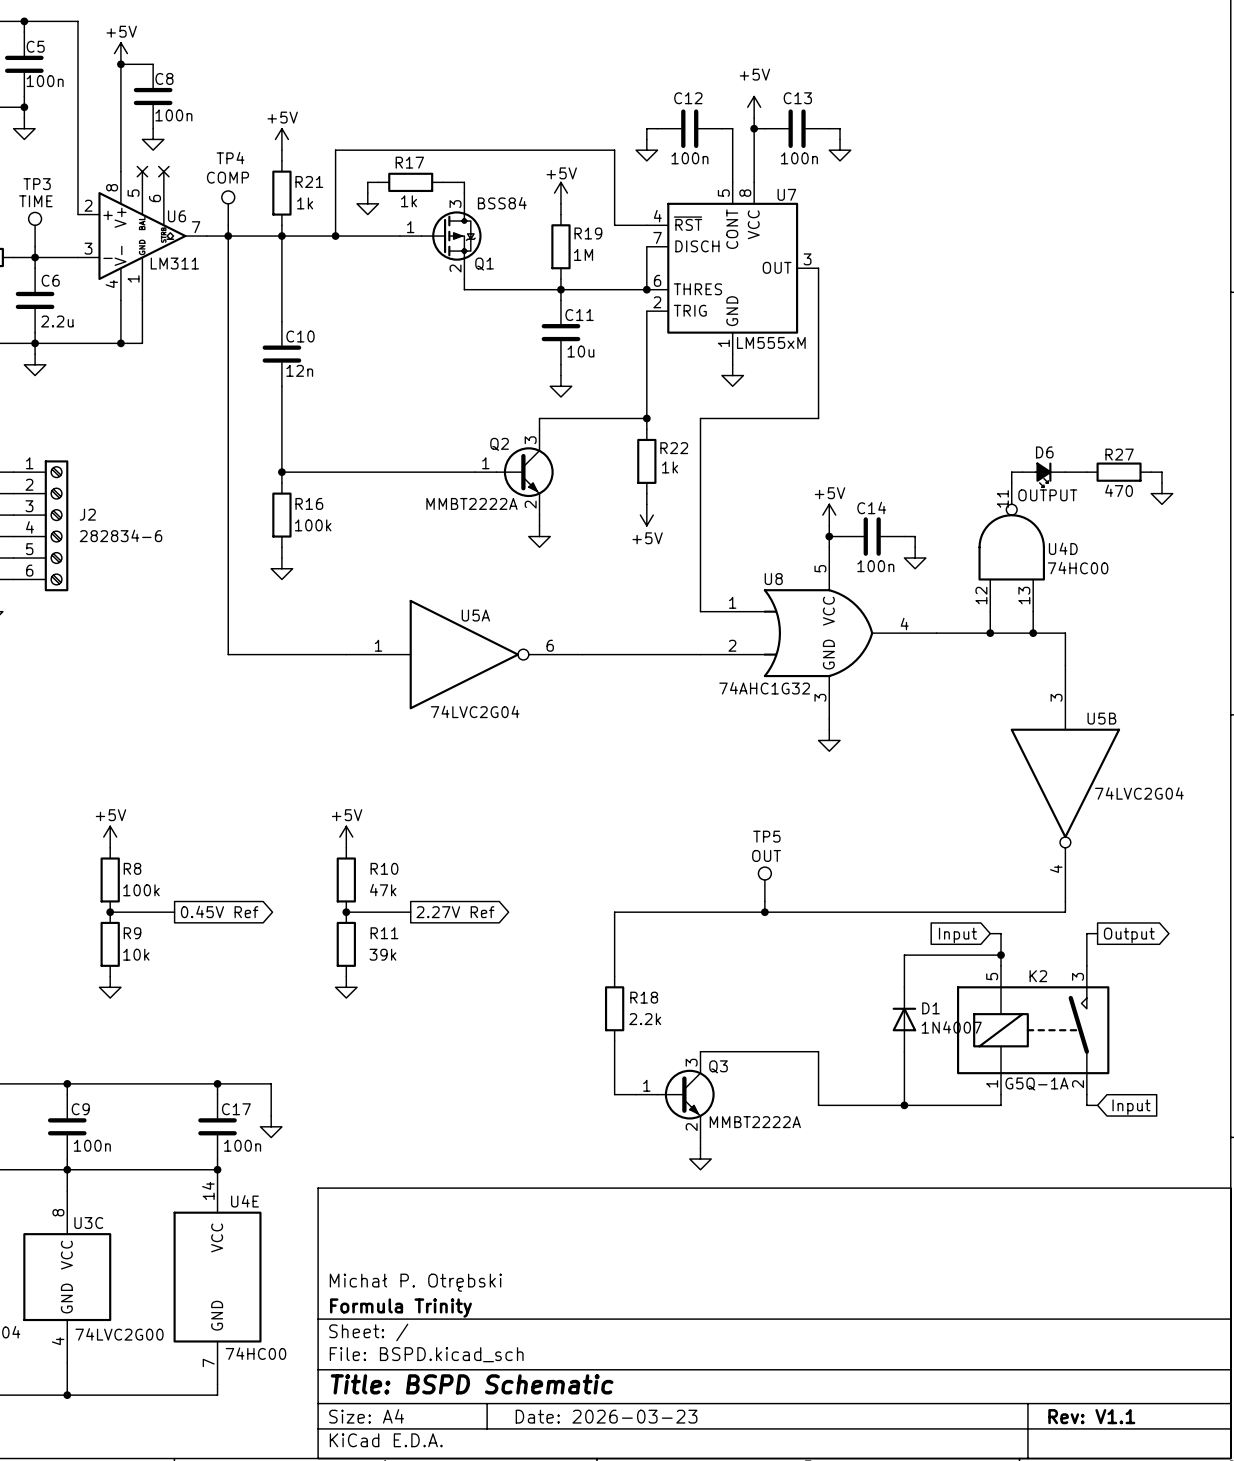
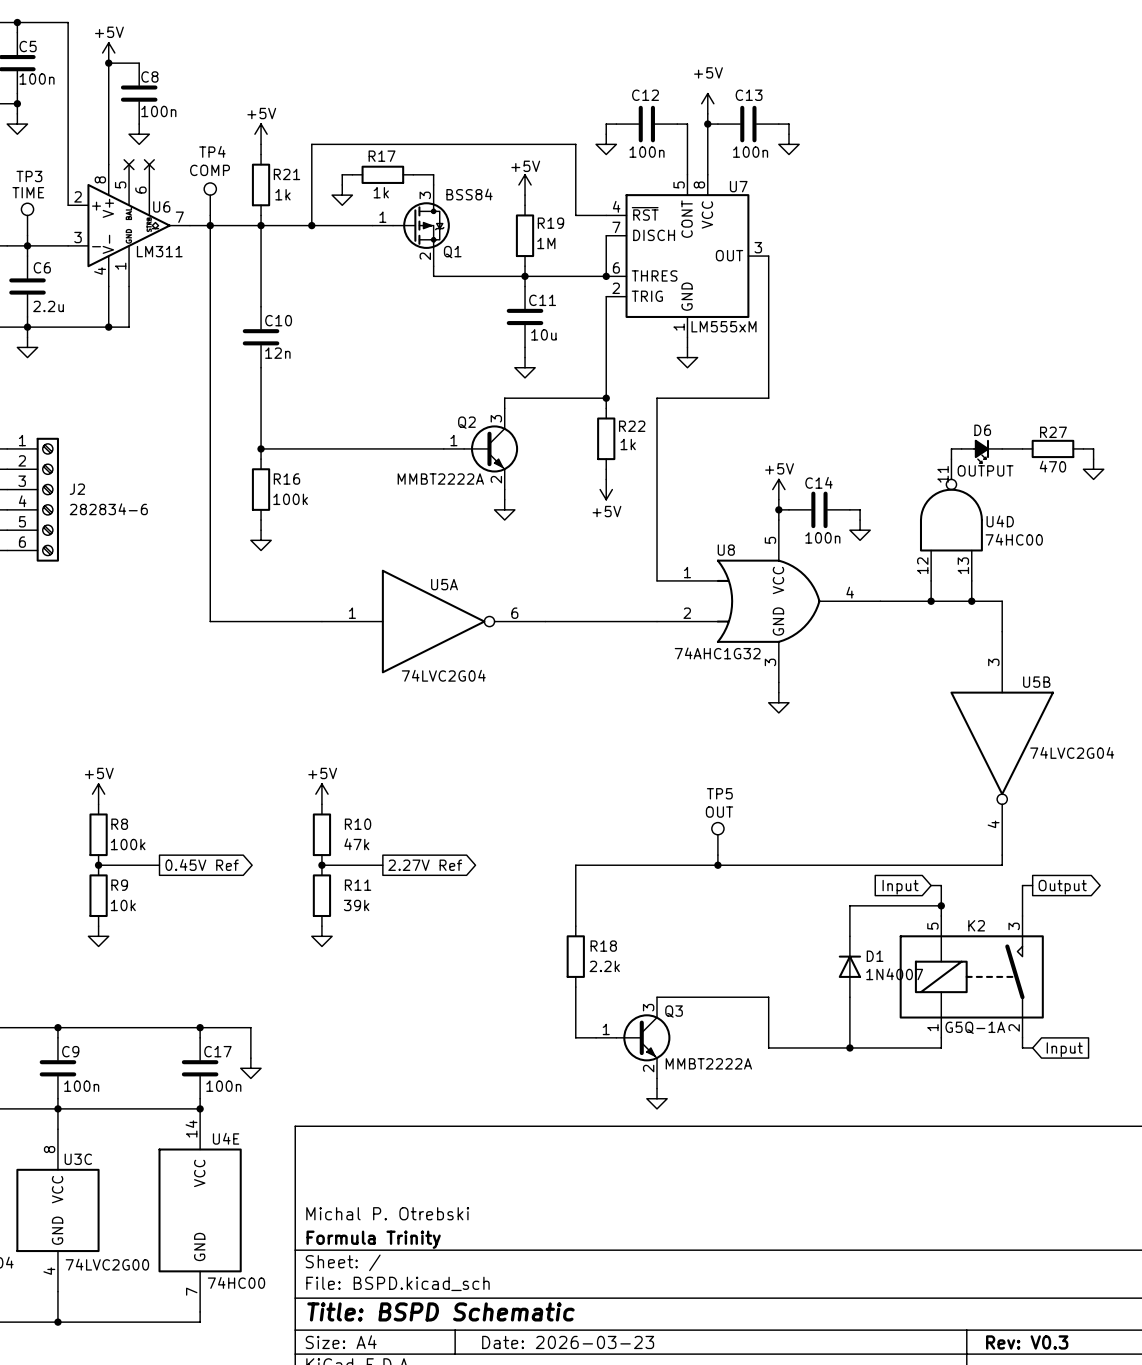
title block: Michał P. Otrębski (415, 1282) -> Michal P. Otrebski (387, 1213)
title block: Rev: V1.1 (1091, 1416) -> Rev: V0.3 (1027, 1342)

